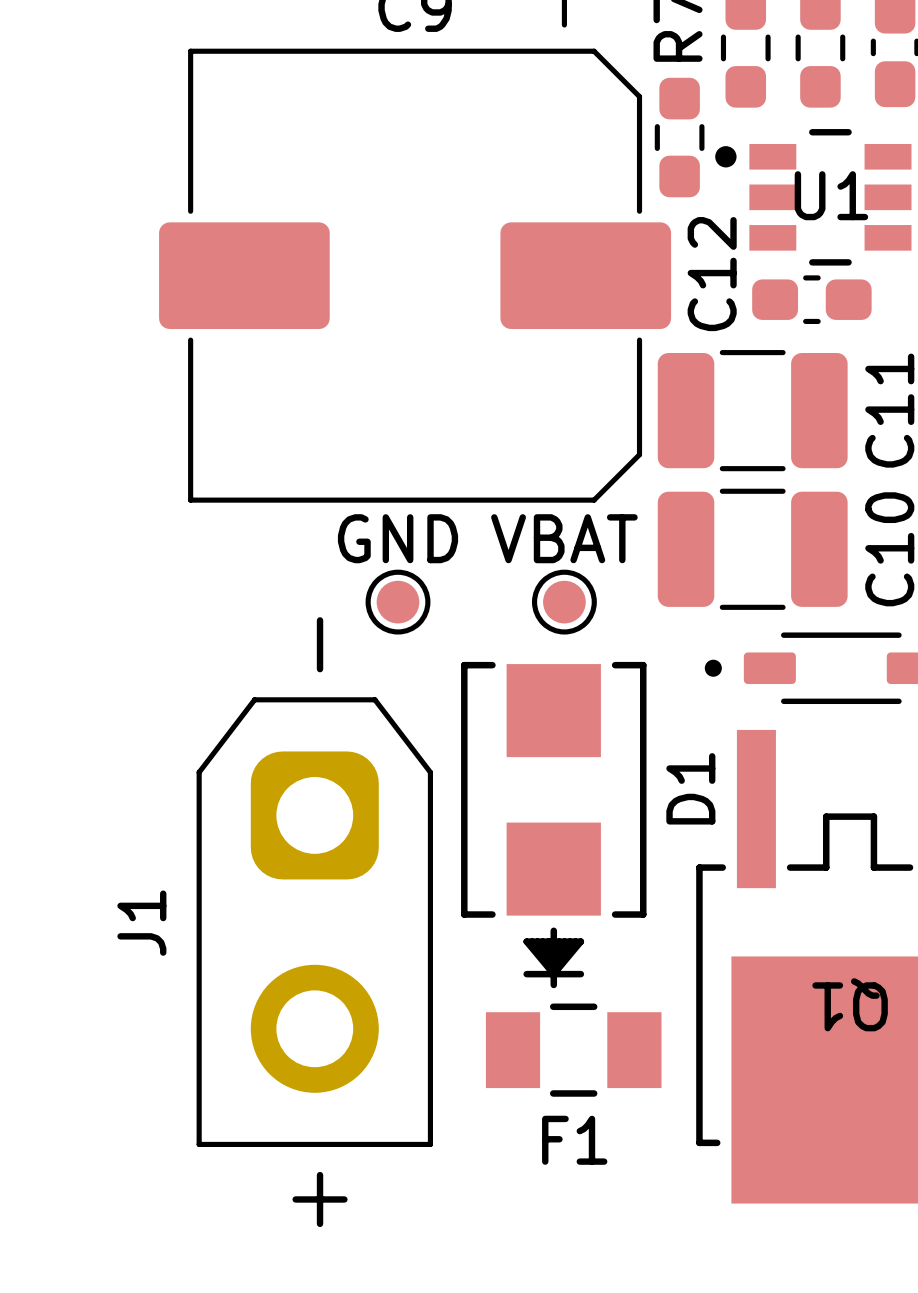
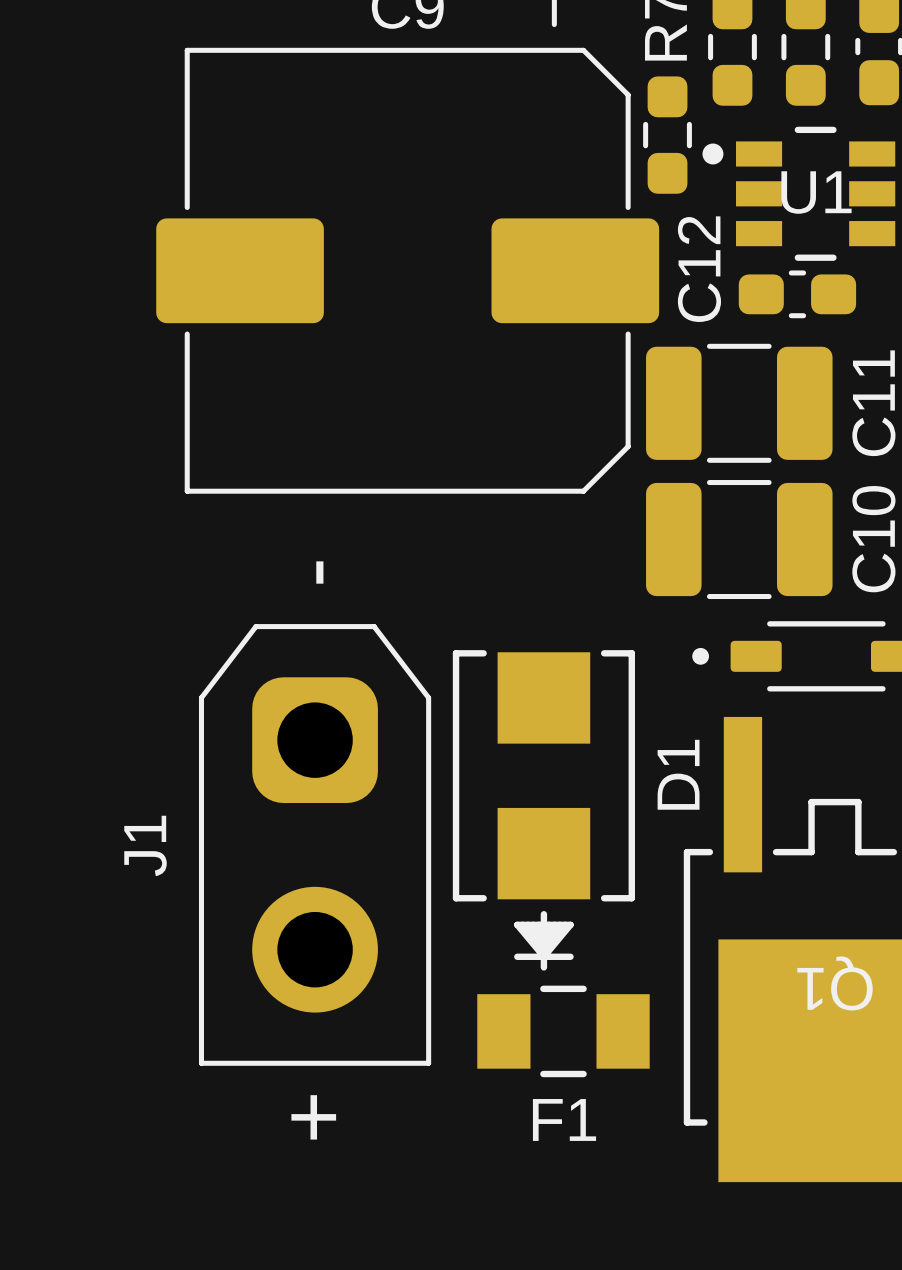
GND: (398, 602) -> none
VBAT: (564, 602) -> none
J1 position: (314, 922) -> (315, 844)

